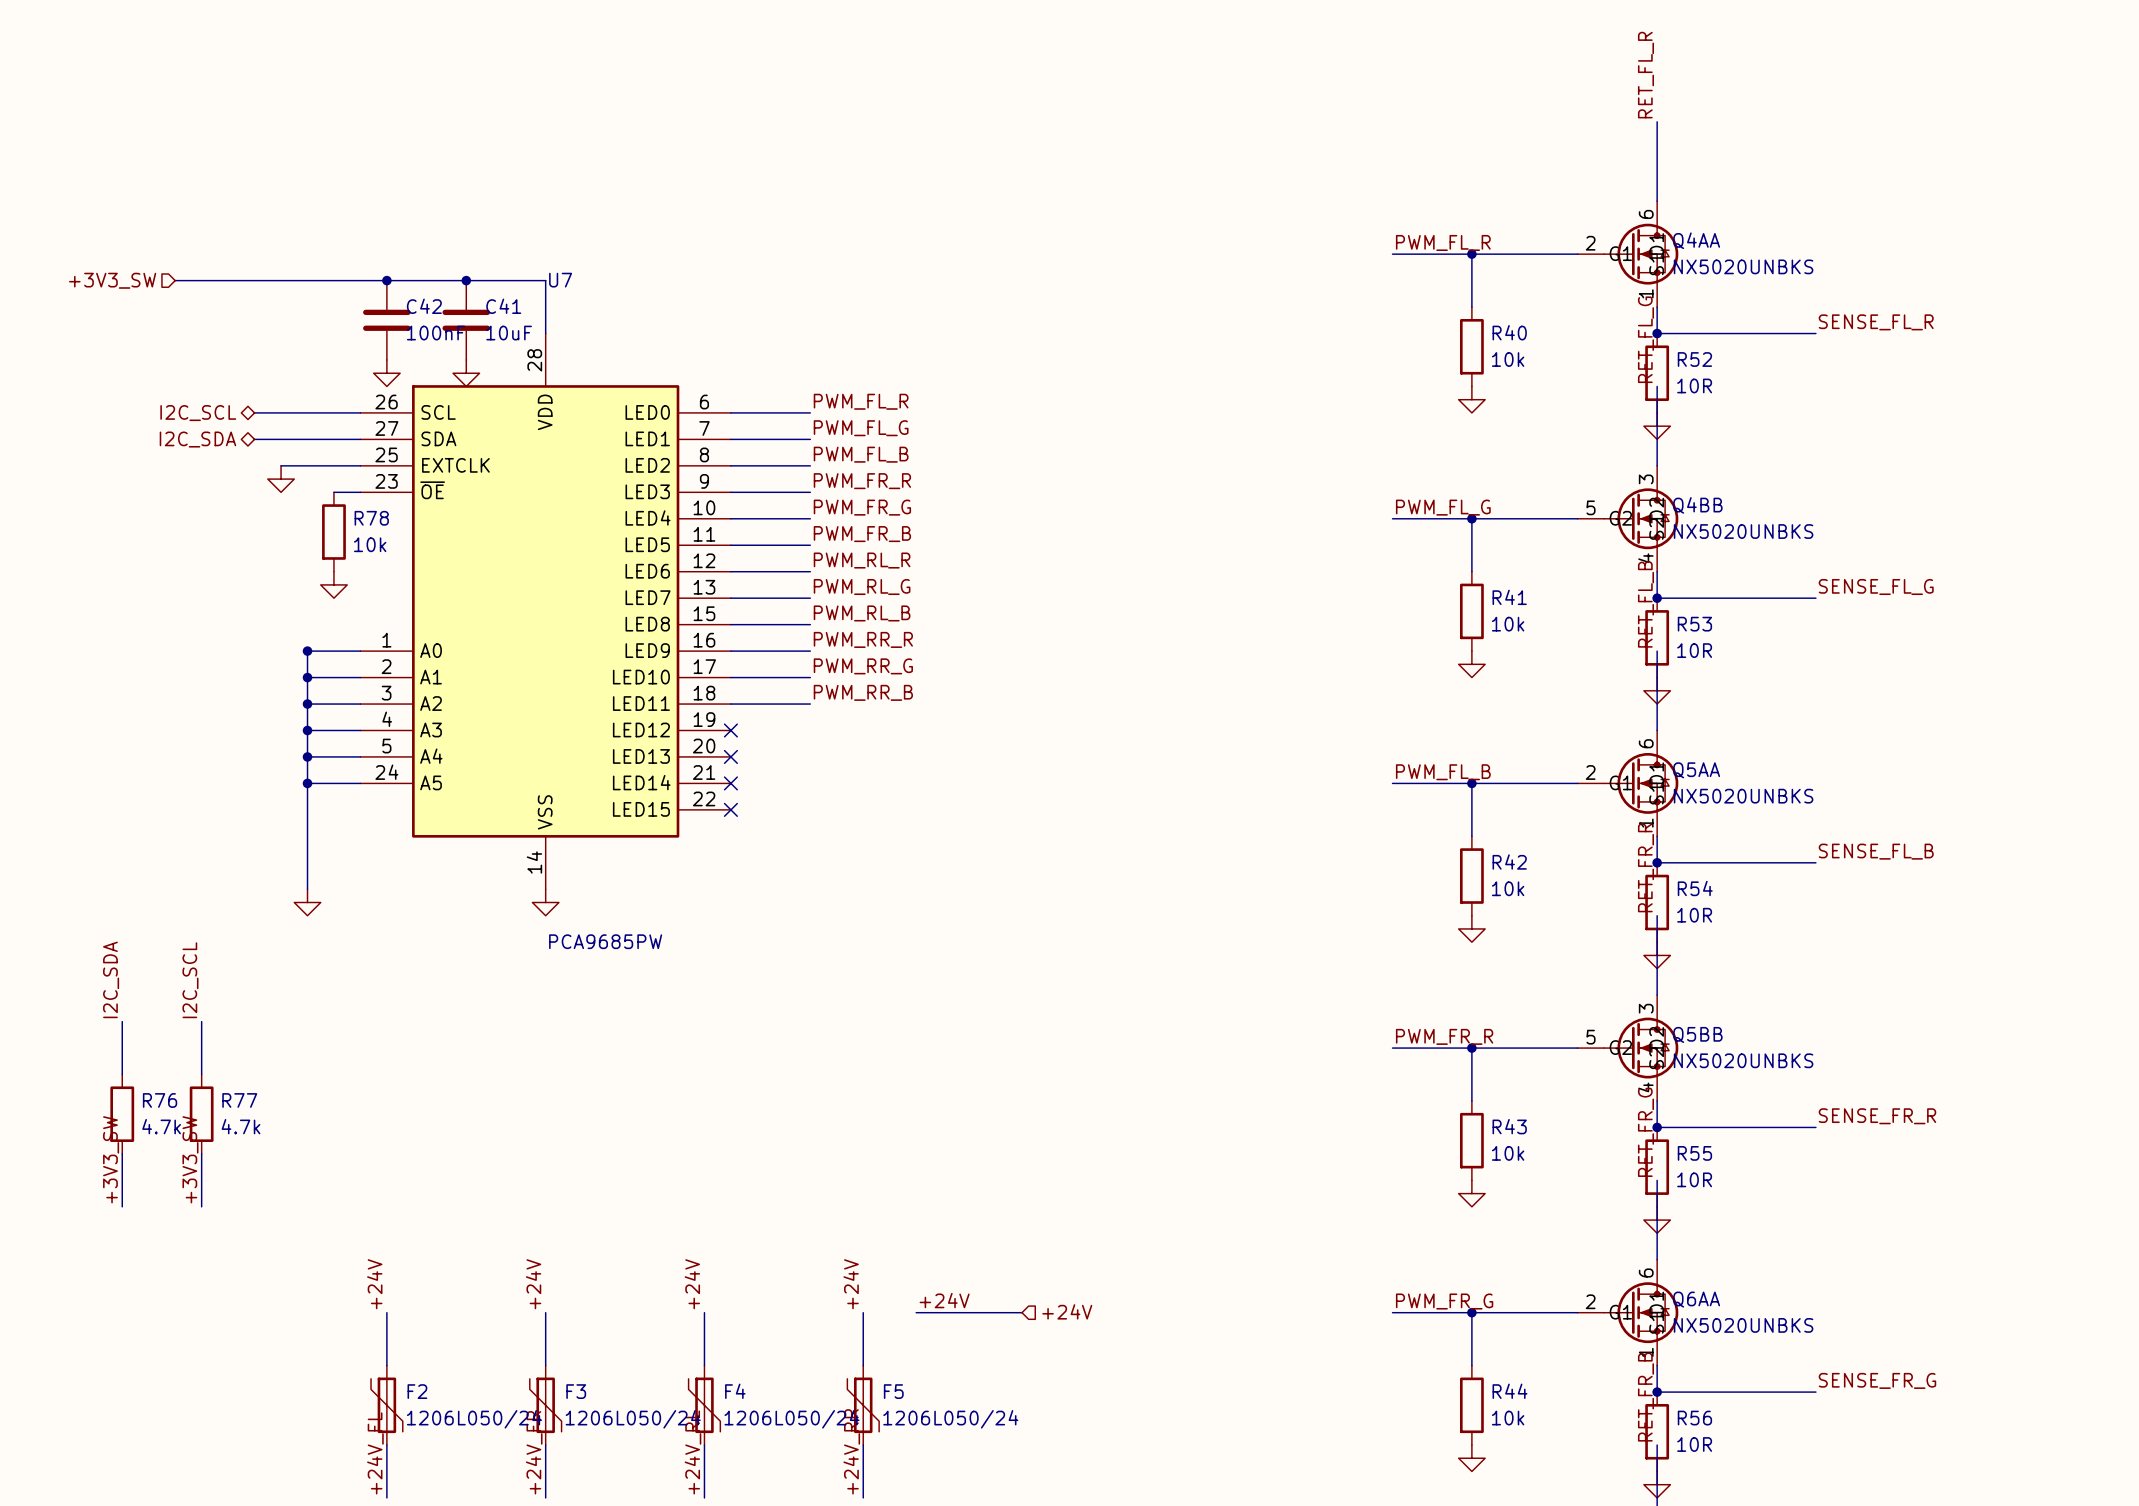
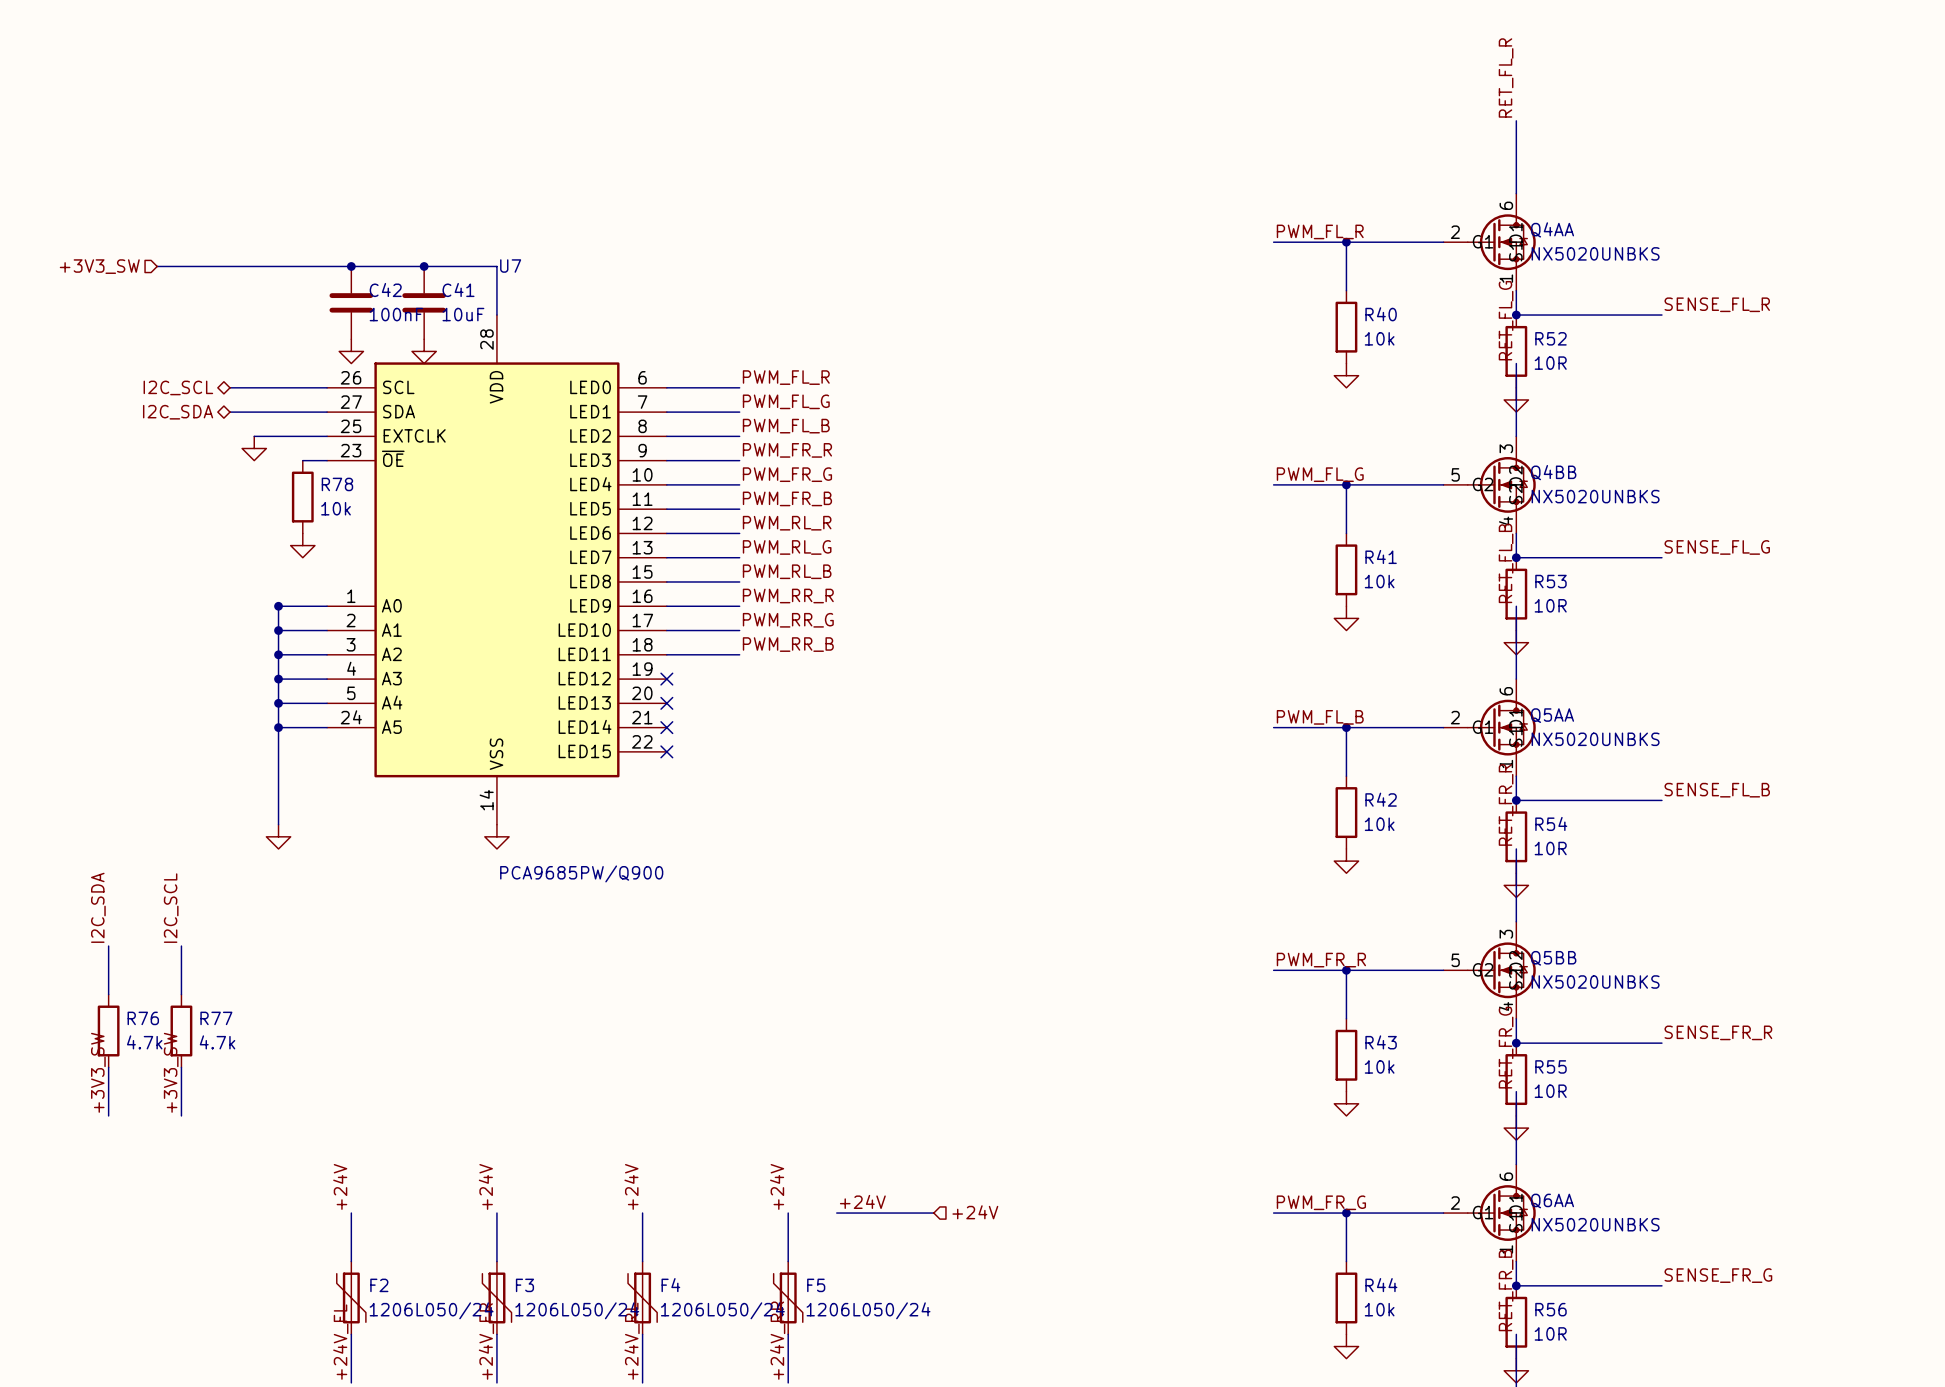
U7 value: PCA9685PW (605, 941) -> PCA9685PW/Q900 (581, 873)

